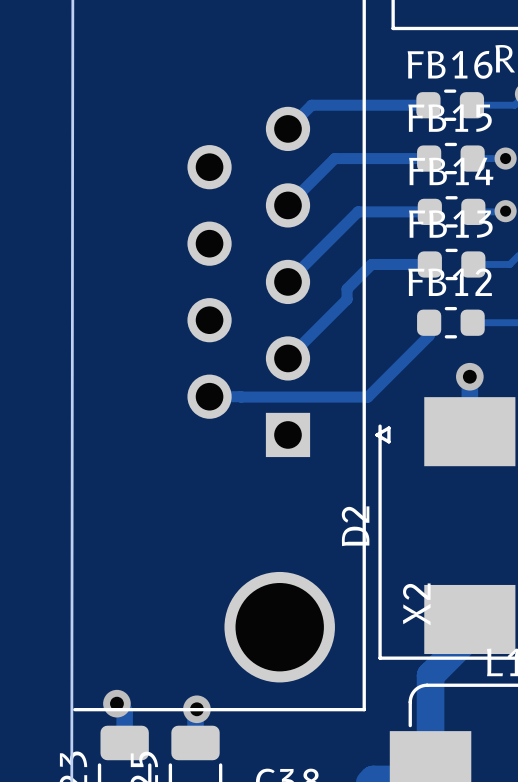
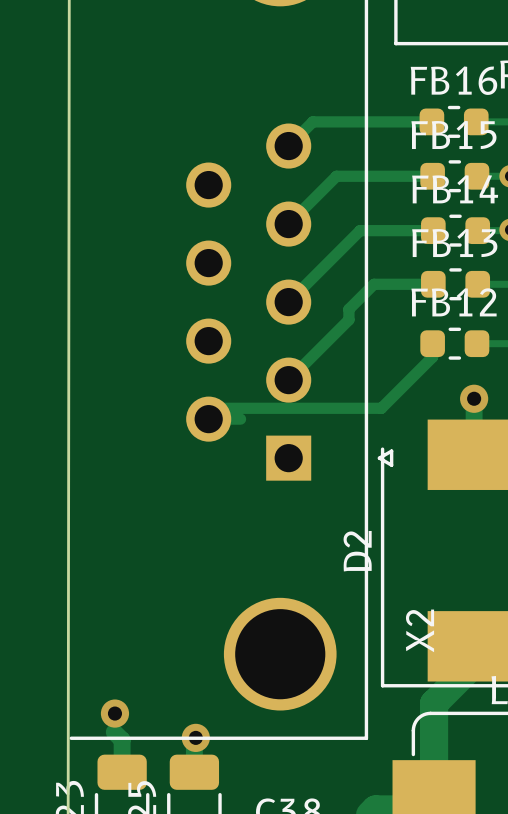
track: (378, 386) (367, 397) (241, 397) -> (381, 408) (207, 408)
via position: (116, 703) -> (114, 713)

